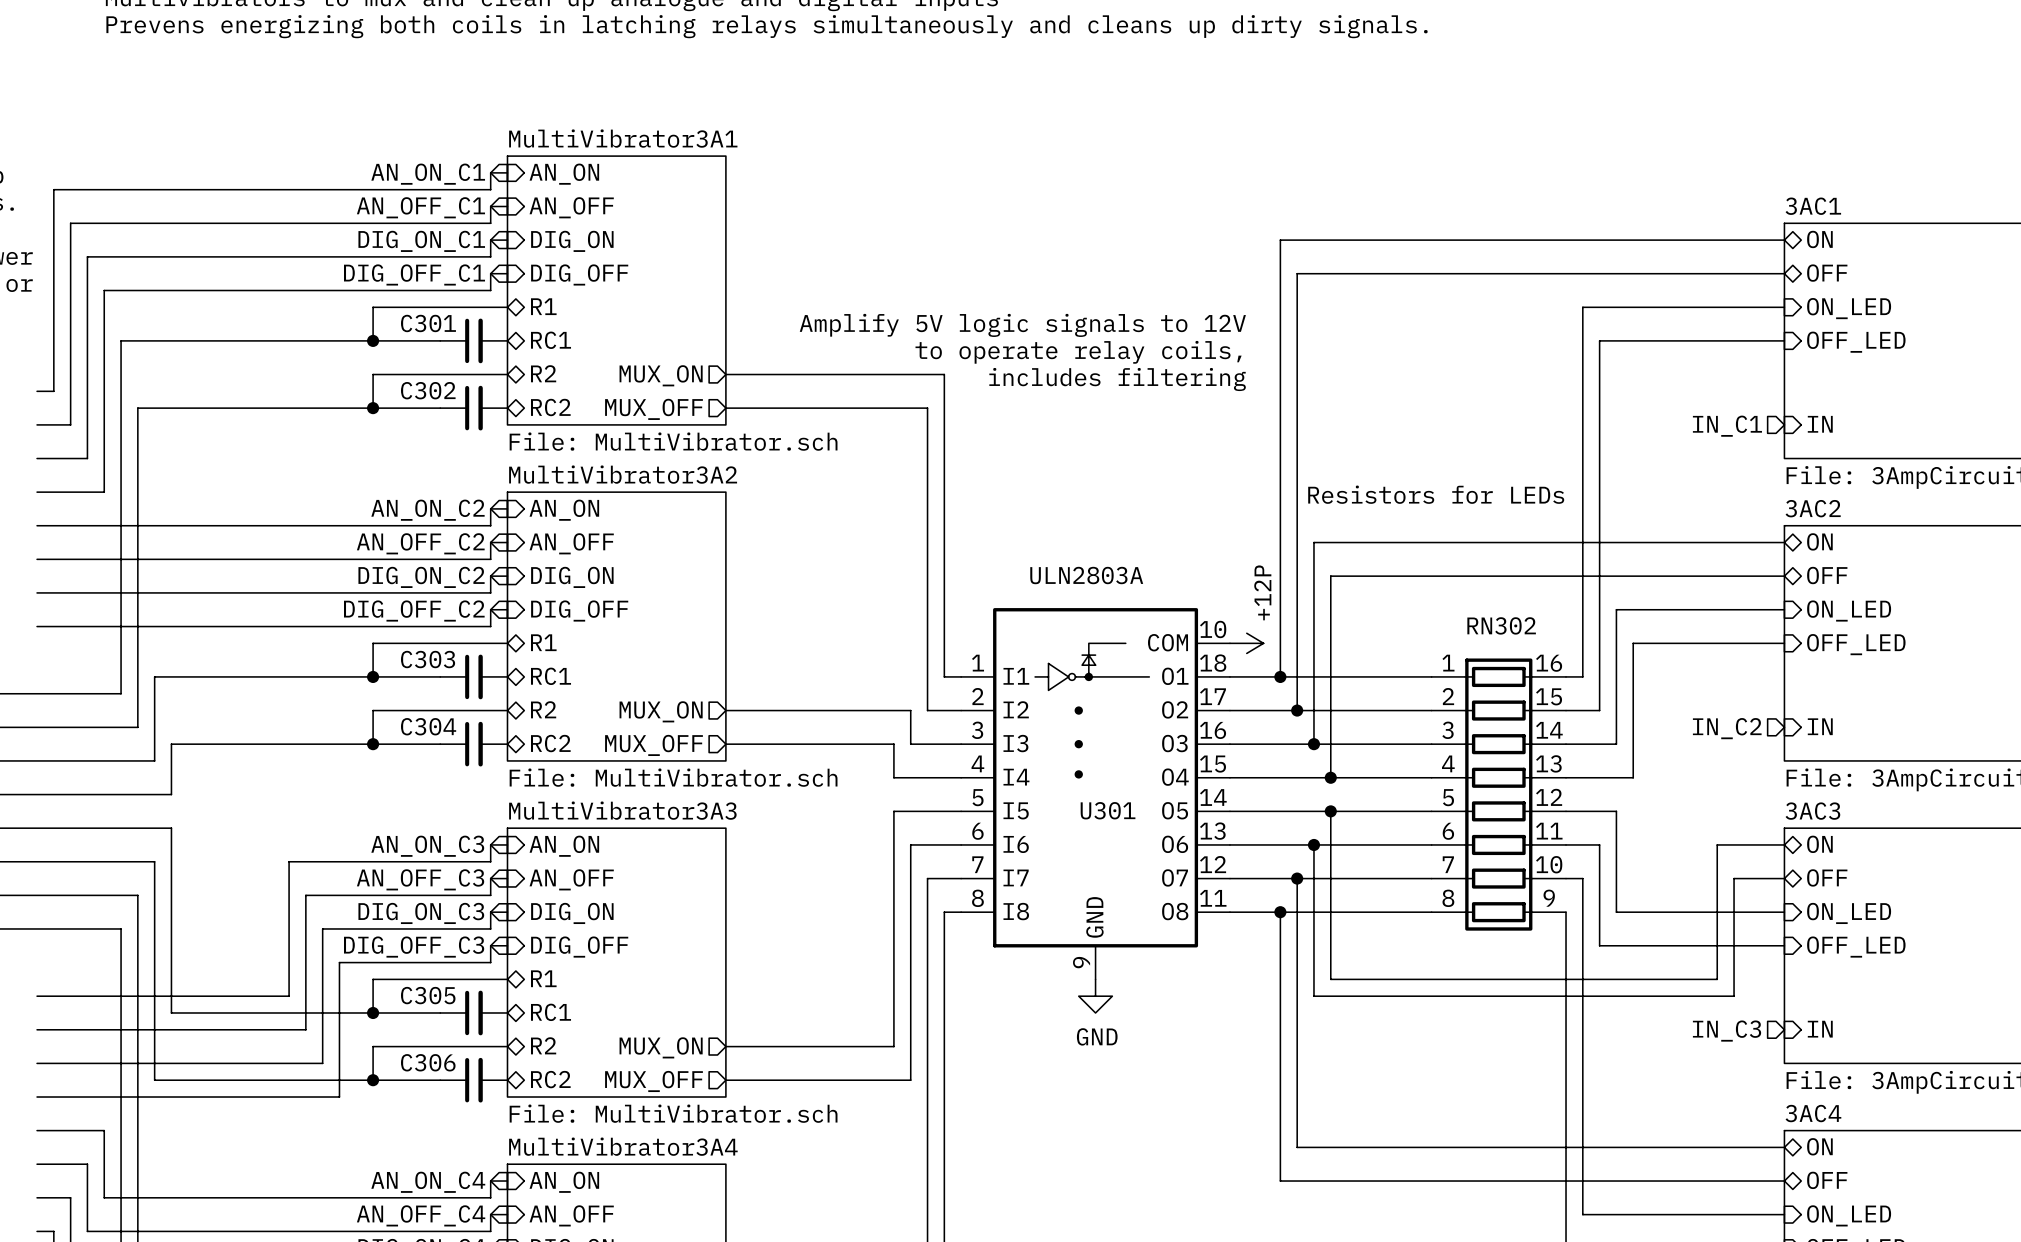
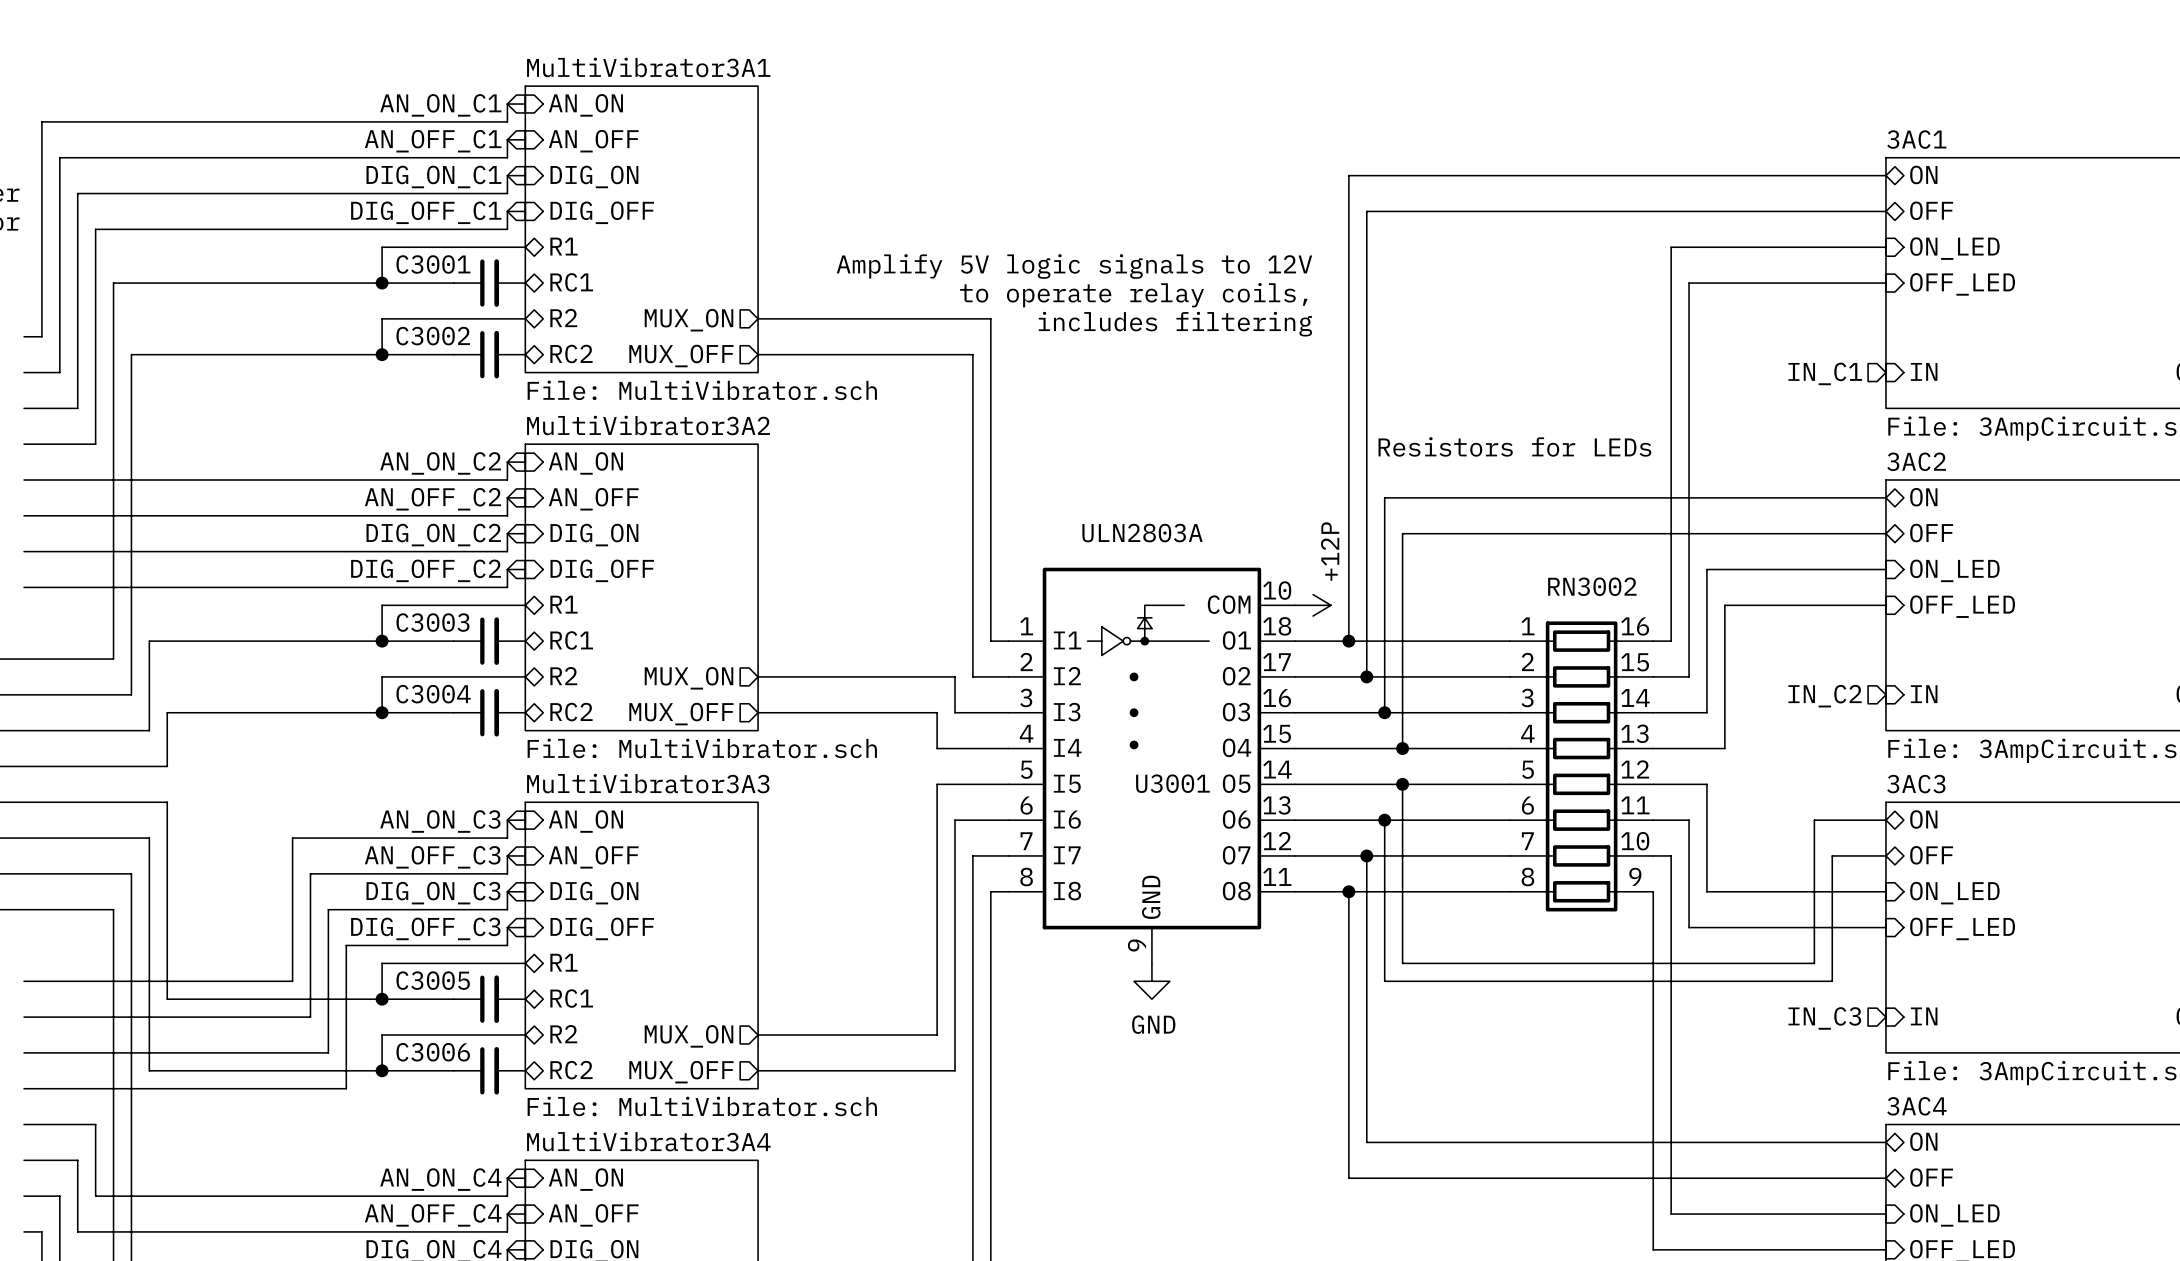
C301 name: C301 (428, 323) -> C3001 (433, 264)
C302 name: C302 (428, 390) -> C3002 (433, 336)
RN302 name: RN302 (1501, 625) -> RN3002 (1592, 586)
C303 name: C303 (428, 659) -> C3003 (432, 622)
C304 name: C304 (428, 726) -> C3004 (433, 694)
U301 name: U301 (1108, 810) -> U3001 (1172, 783)
C305 name: C305 (428, 995) -> C3005 (433, 980)
C306 name: C306 (428, 1062) -> C3006 (433, 1052)

